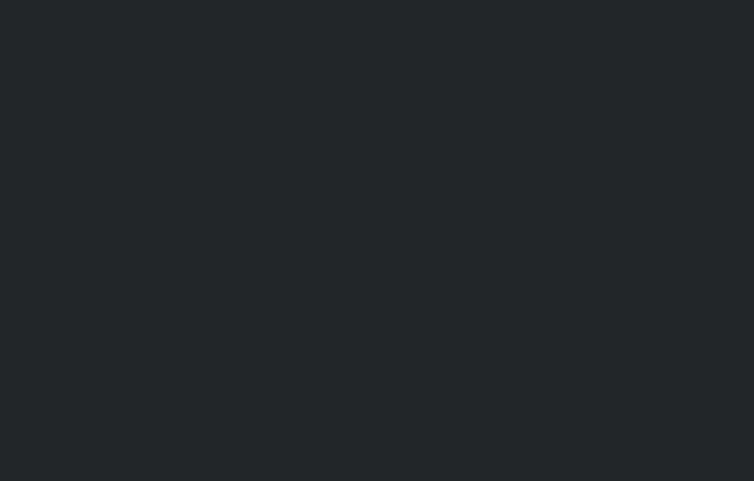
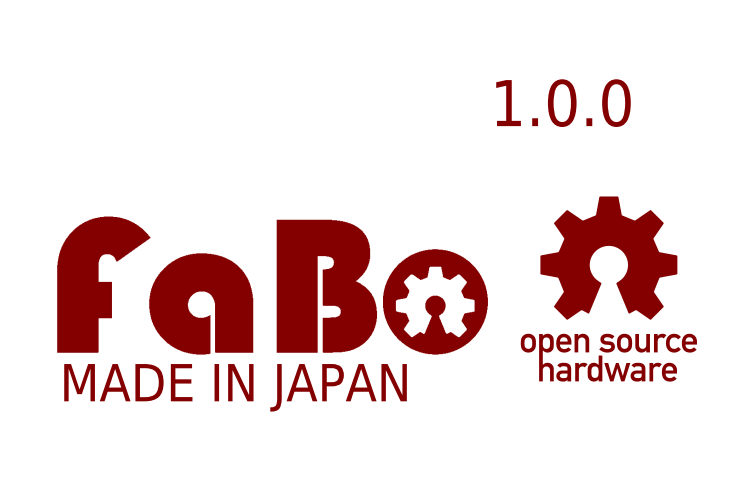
text: none -> 1.0.0 (563, 103)
part: none -> (272, 285)
part: none -> (608, 289)

